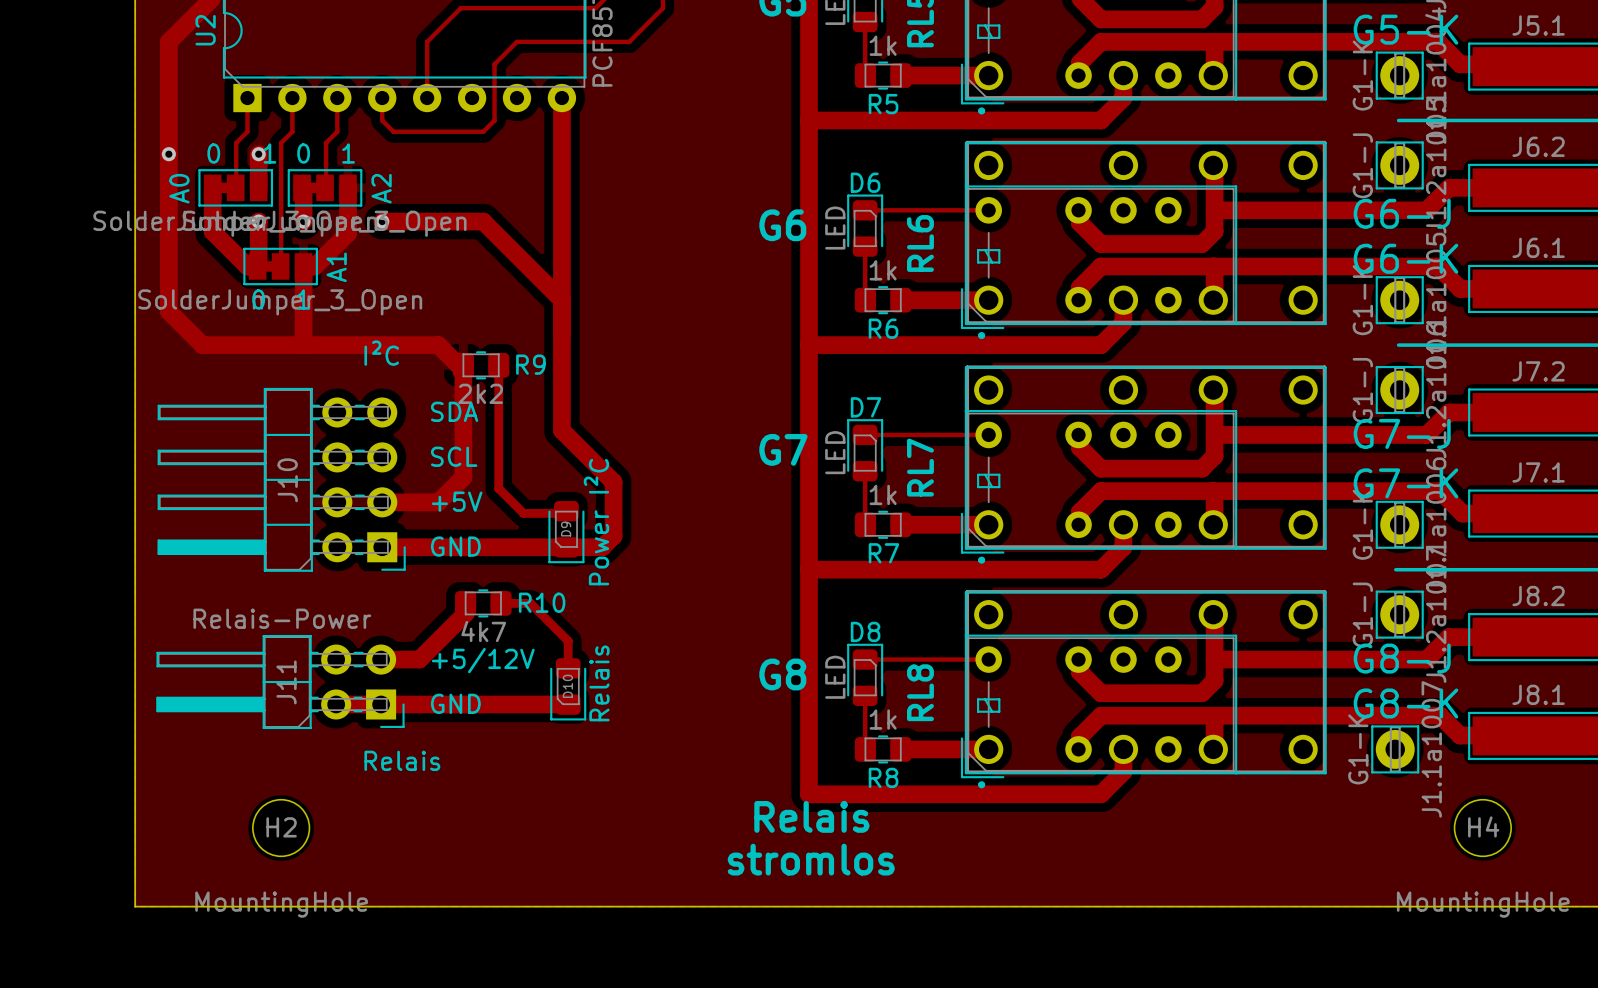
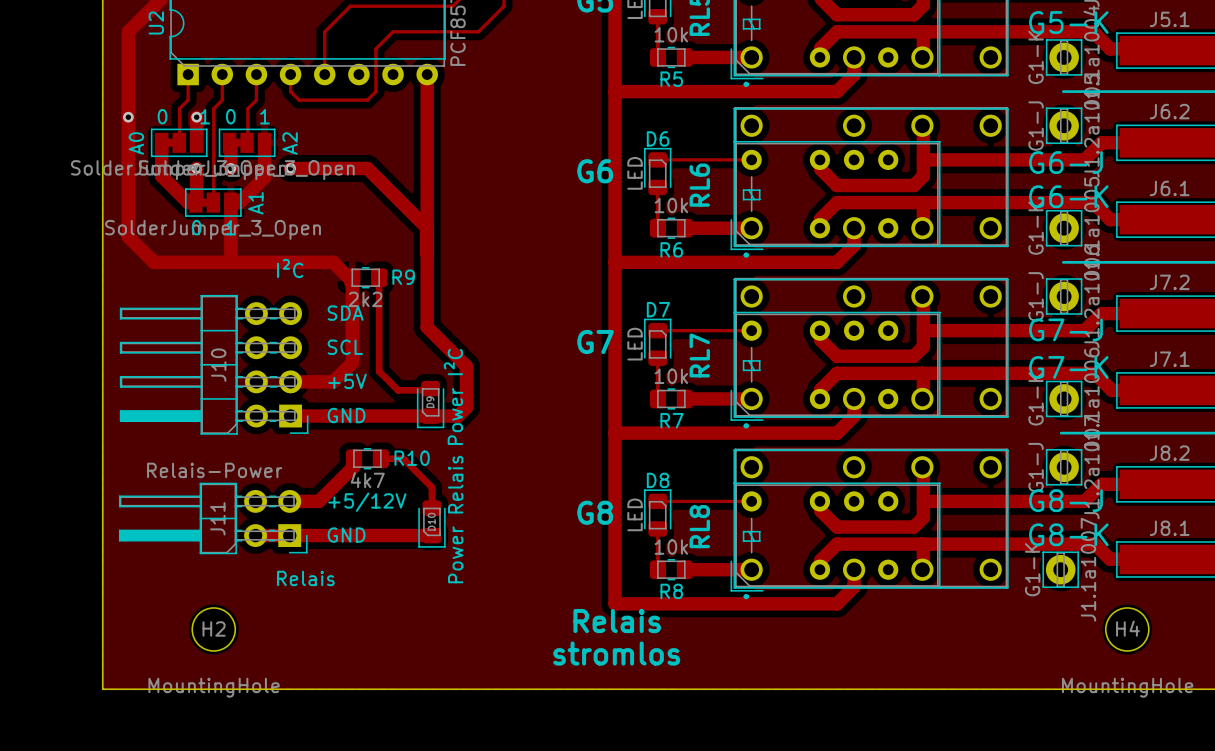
R5 value: 1k (883, 45) -> 10k (671, 34)
R6 value: 1k (883, 270) -> 10k (671, 205)
R7 value: 1k (883, 494) -> 10k (671, 376)
D10 value: Relais (599, 683) -> Power Relais (455, 519)
R8 value: 1k (883, 719) -> 10k (671, 547)

